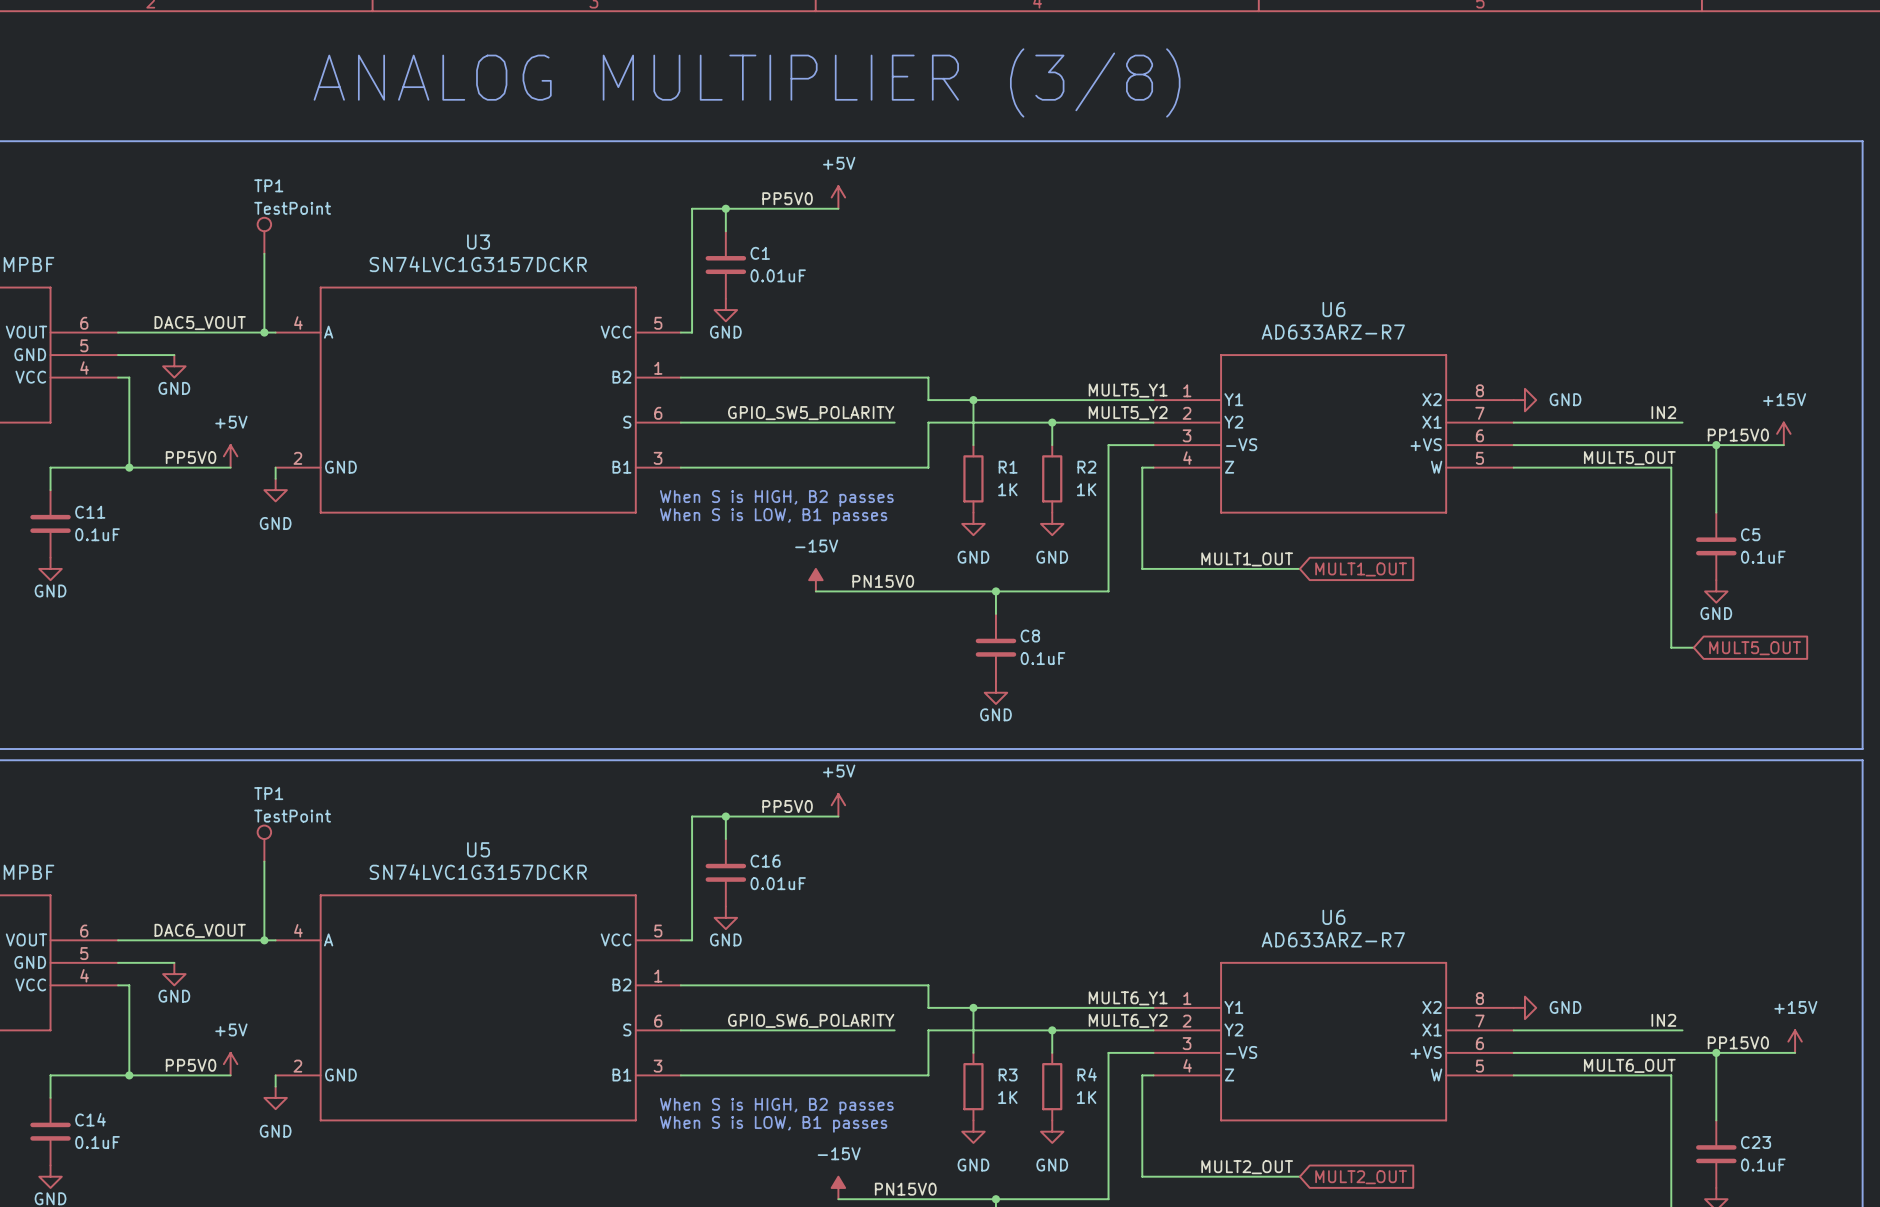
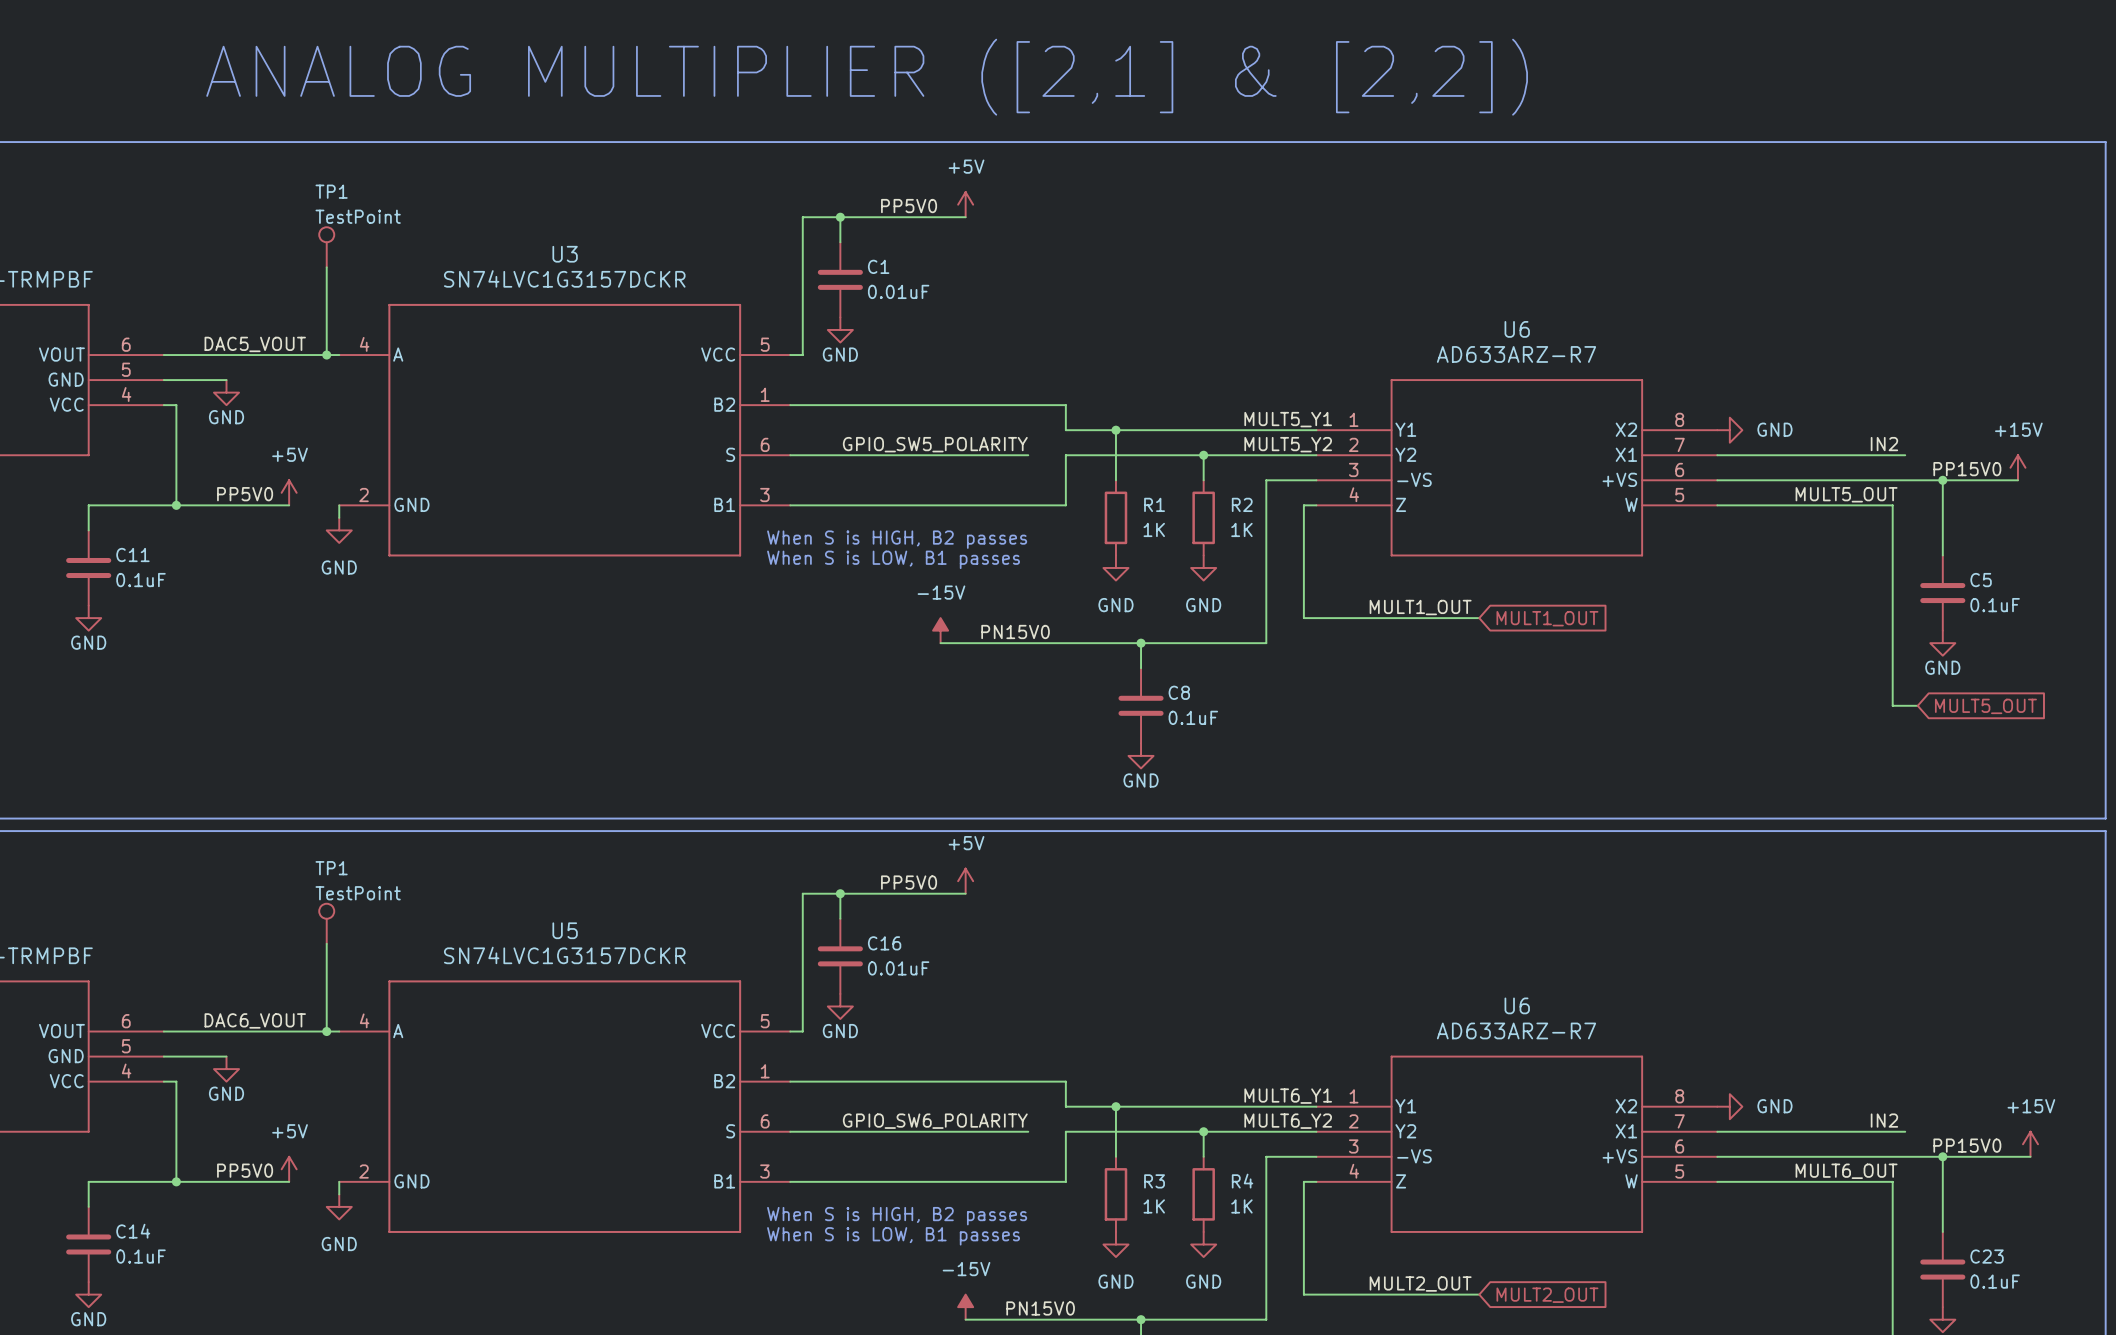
text: ANALOG MULTIPLIER (3/8) (747, 82) -> ANALOG MULTIPLIER ([2,1] & [2,2]) (867, 77)

